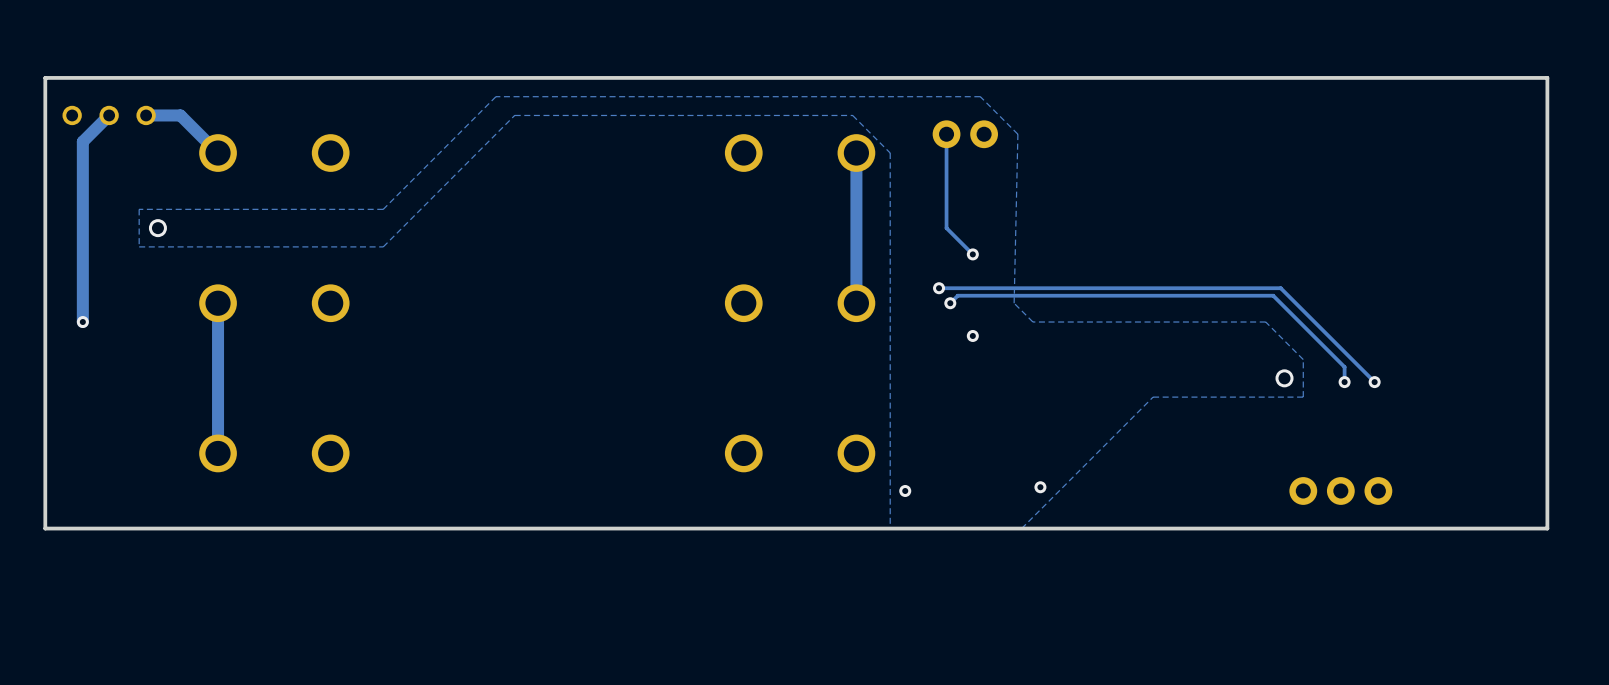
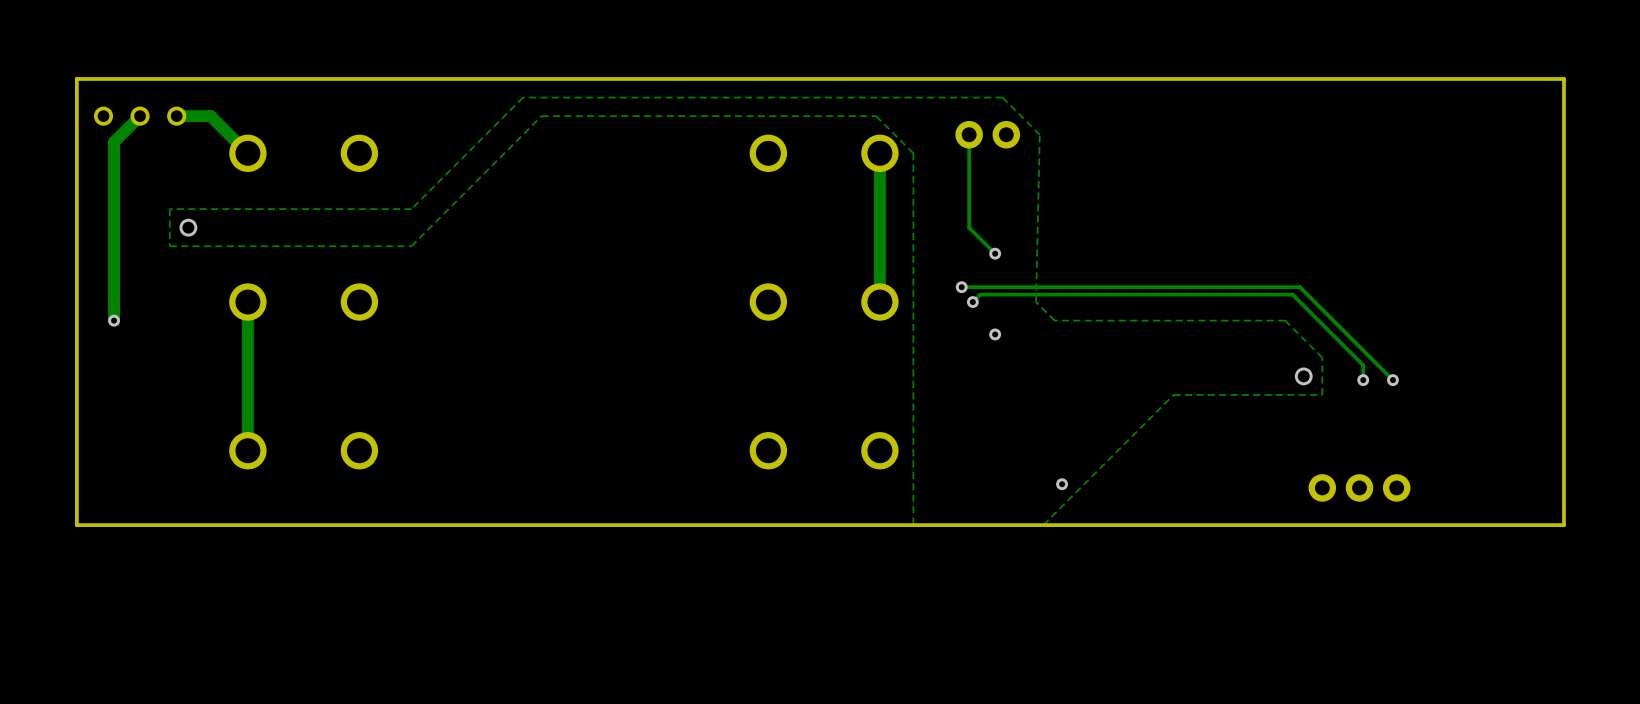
via: (905, 490) -> none

